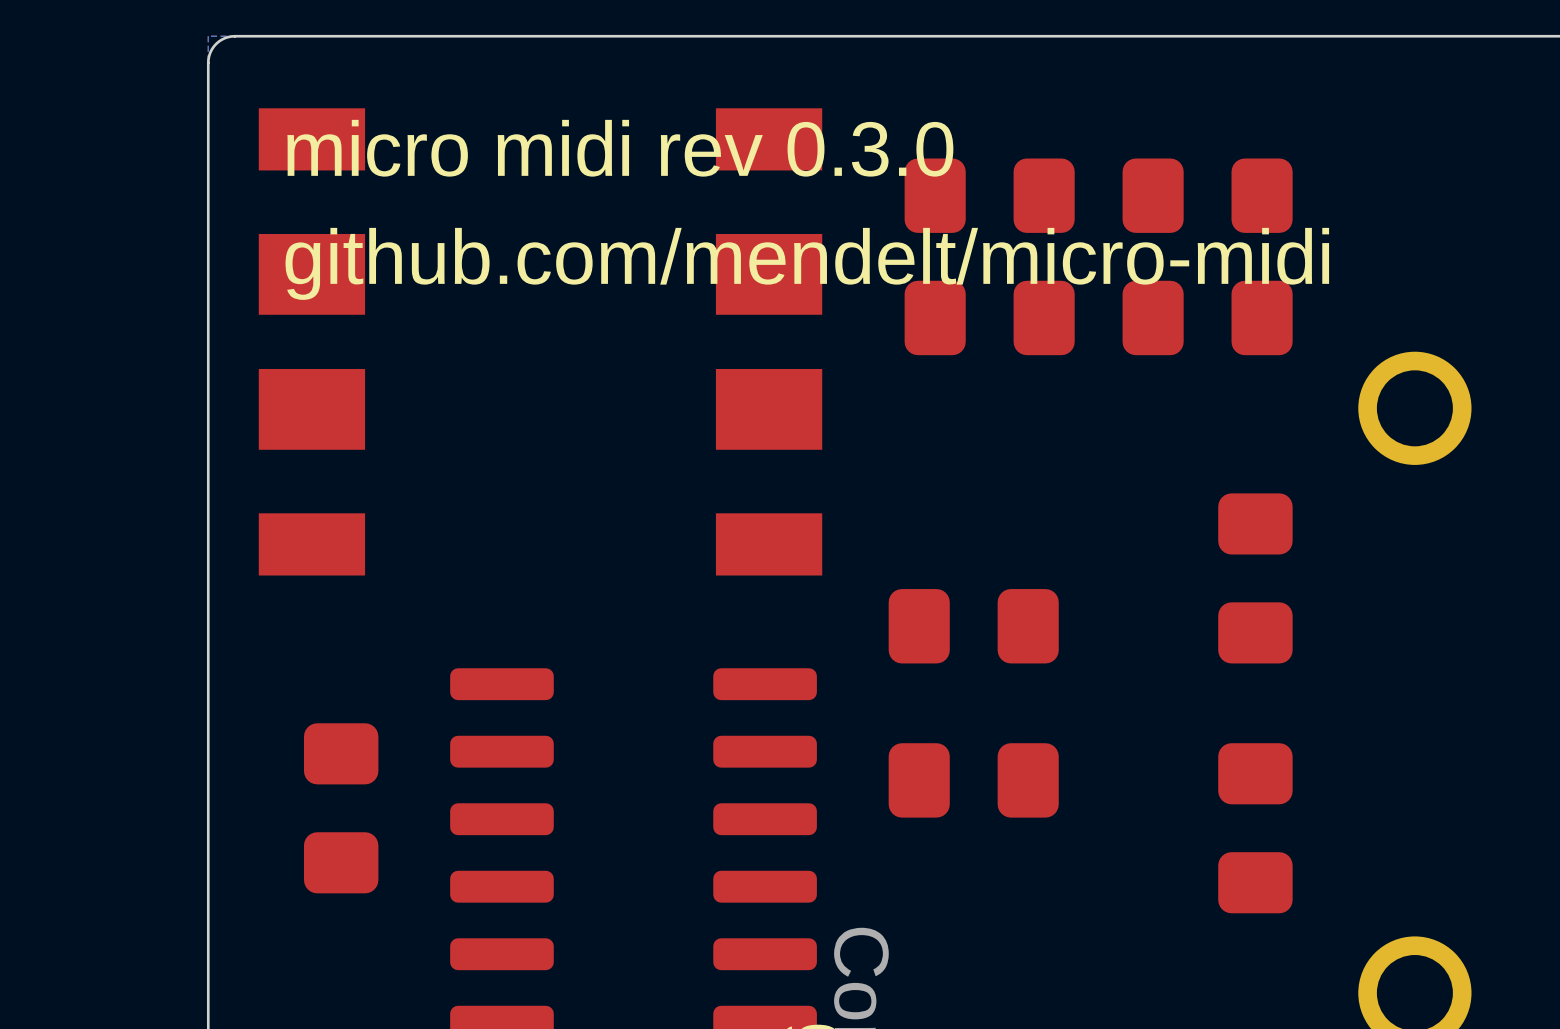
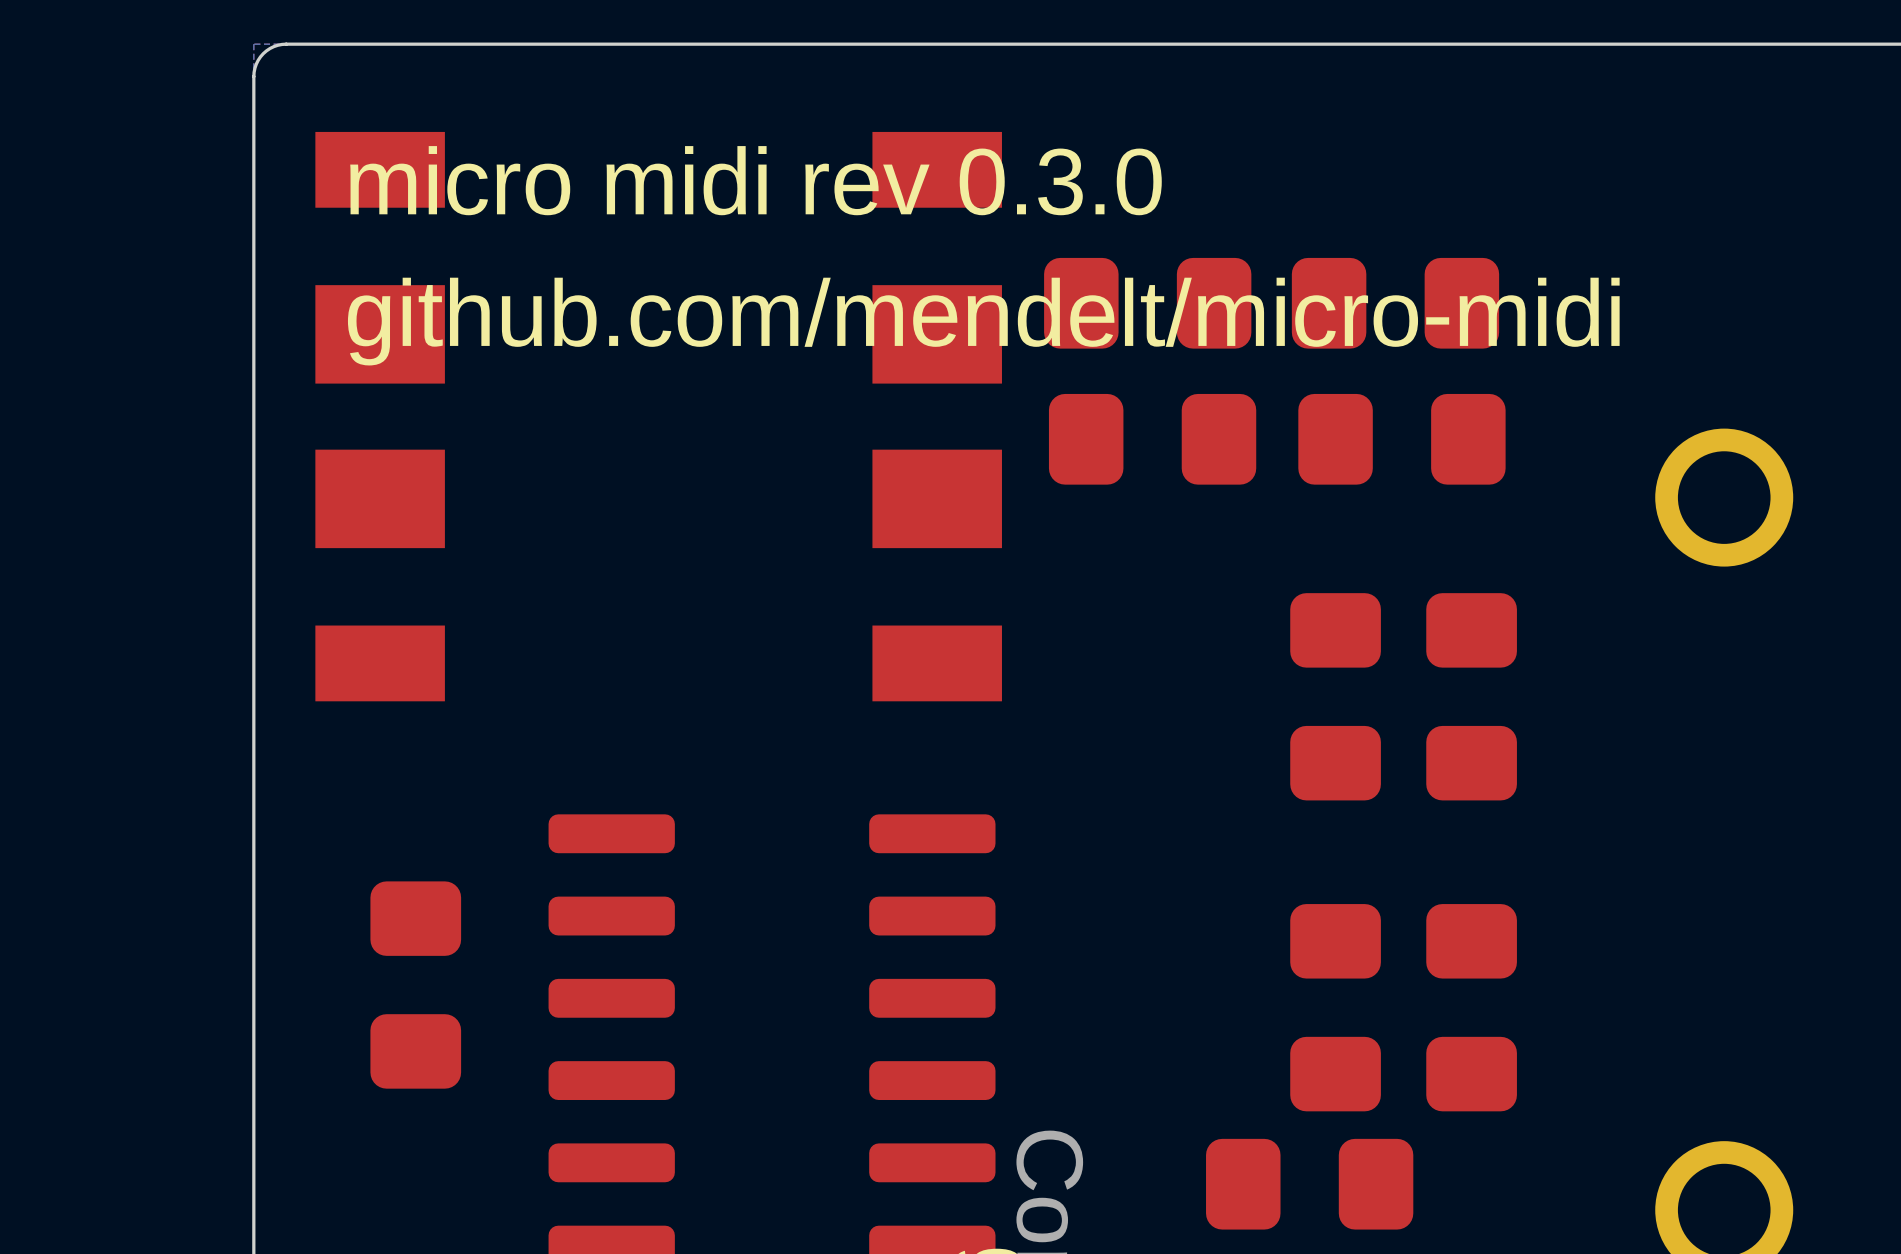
part: (989, 195) -> none
part: (1207, 195) -> none
part: none -> (1147, 303)
part: none -> (1395, 303)
part: (989, 317) -> none
part: (1207, 317) -> none
part: none -> (1152, 439)
part: none -> (1401, 439)
part: none -> (1335, 696)
part position: (1255, 578) -> (1471, 696)
part: (973, 626) -> none
part: (973, 780) -> none
part: none -> (1335, 1007)
part position: (1255, 828) -> (1471, 1007)
part: none -> (1309, 1184)

